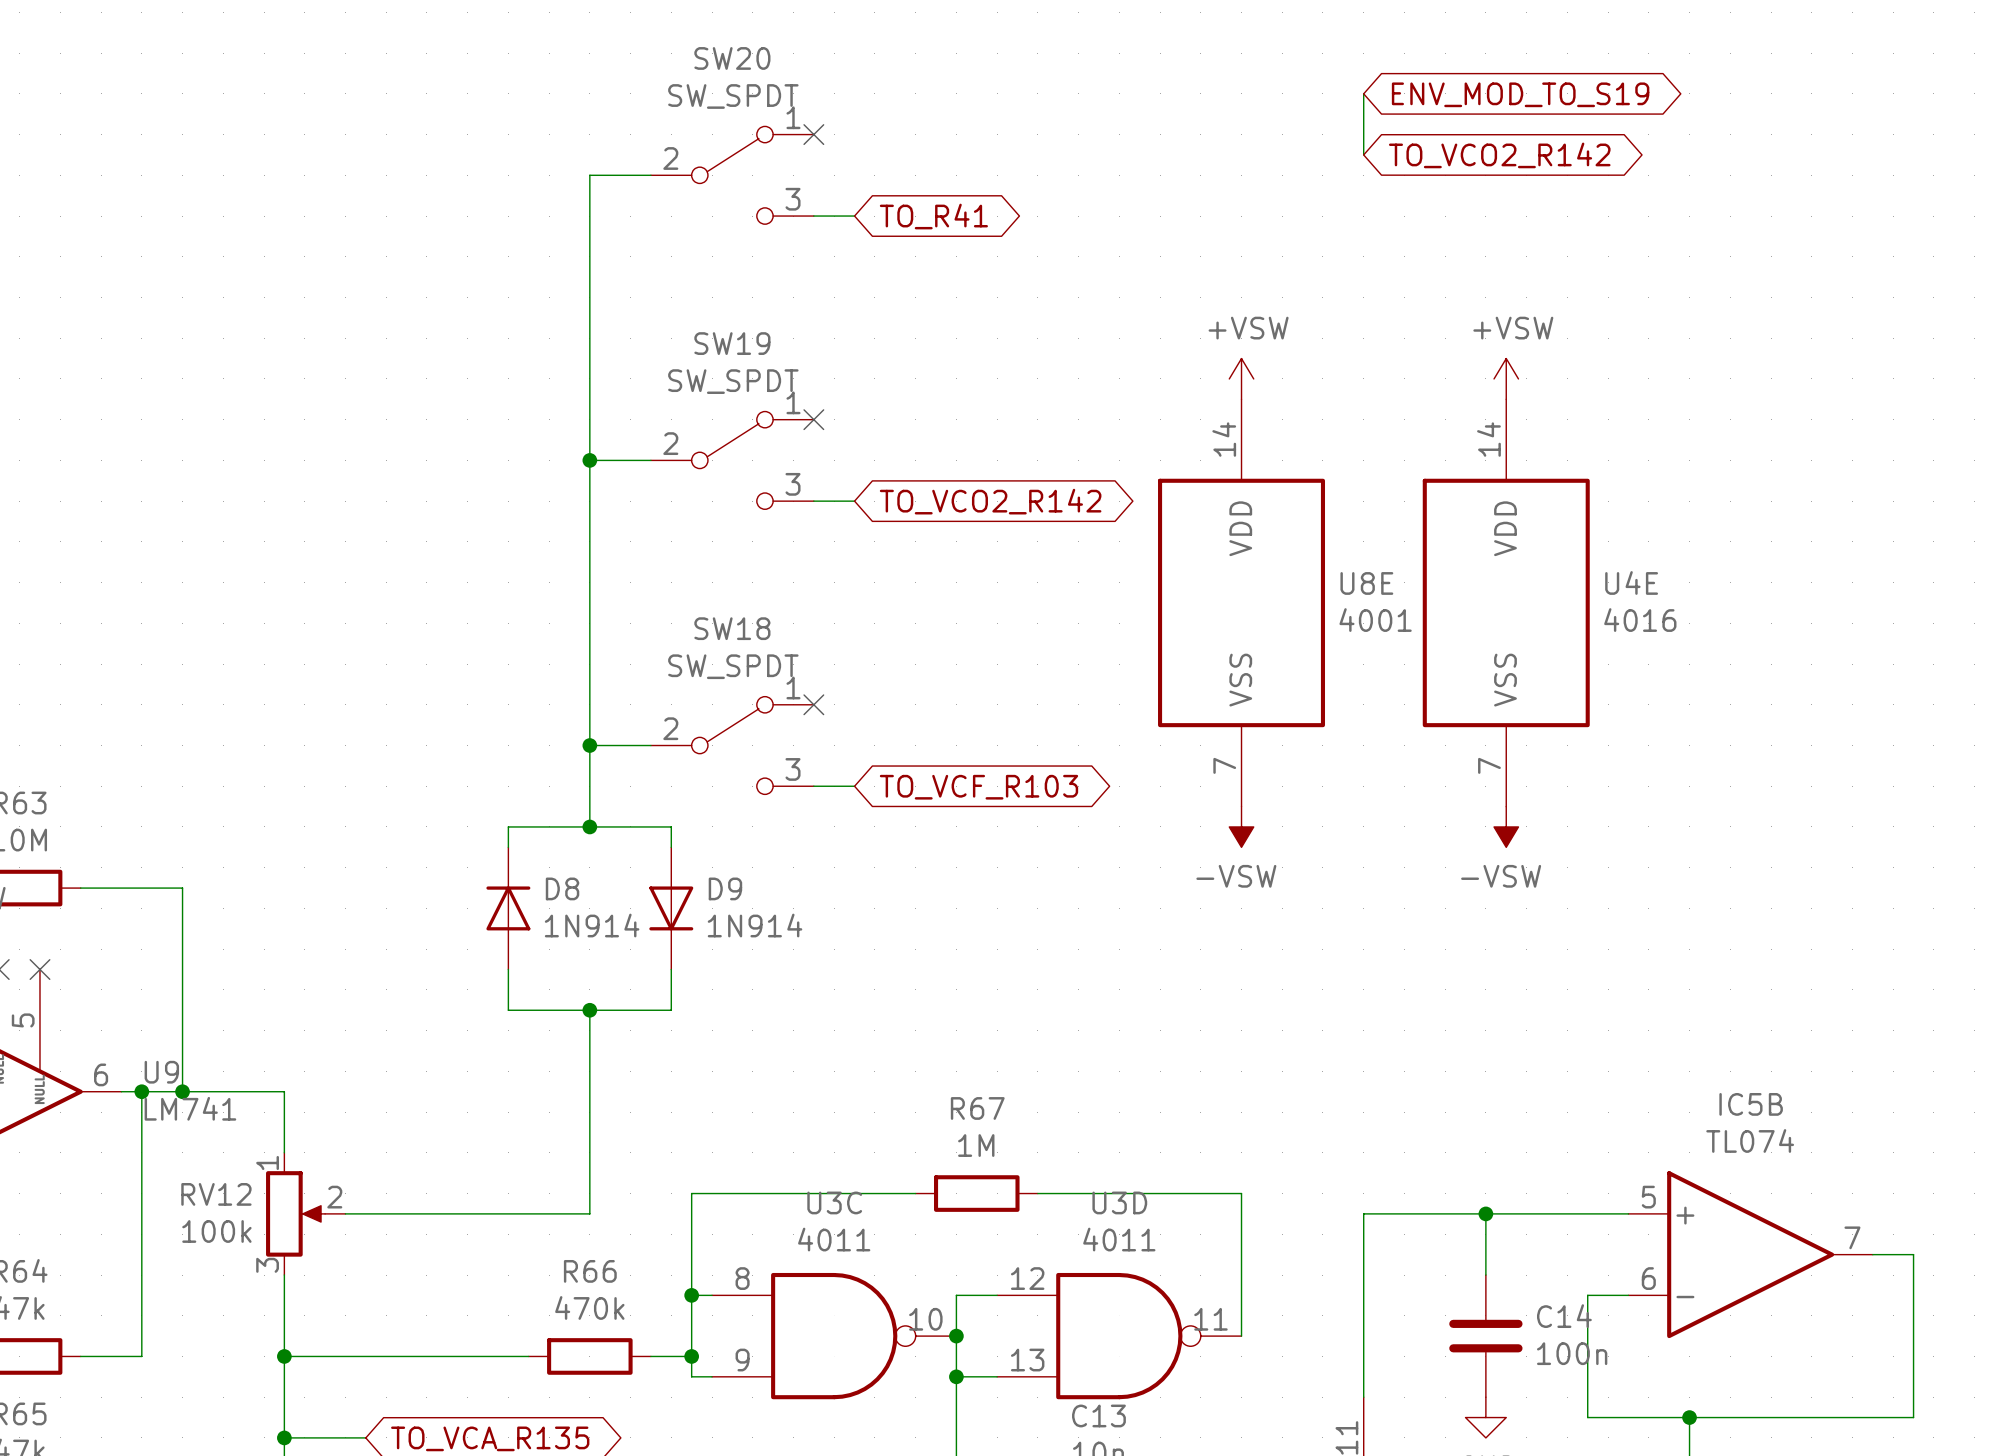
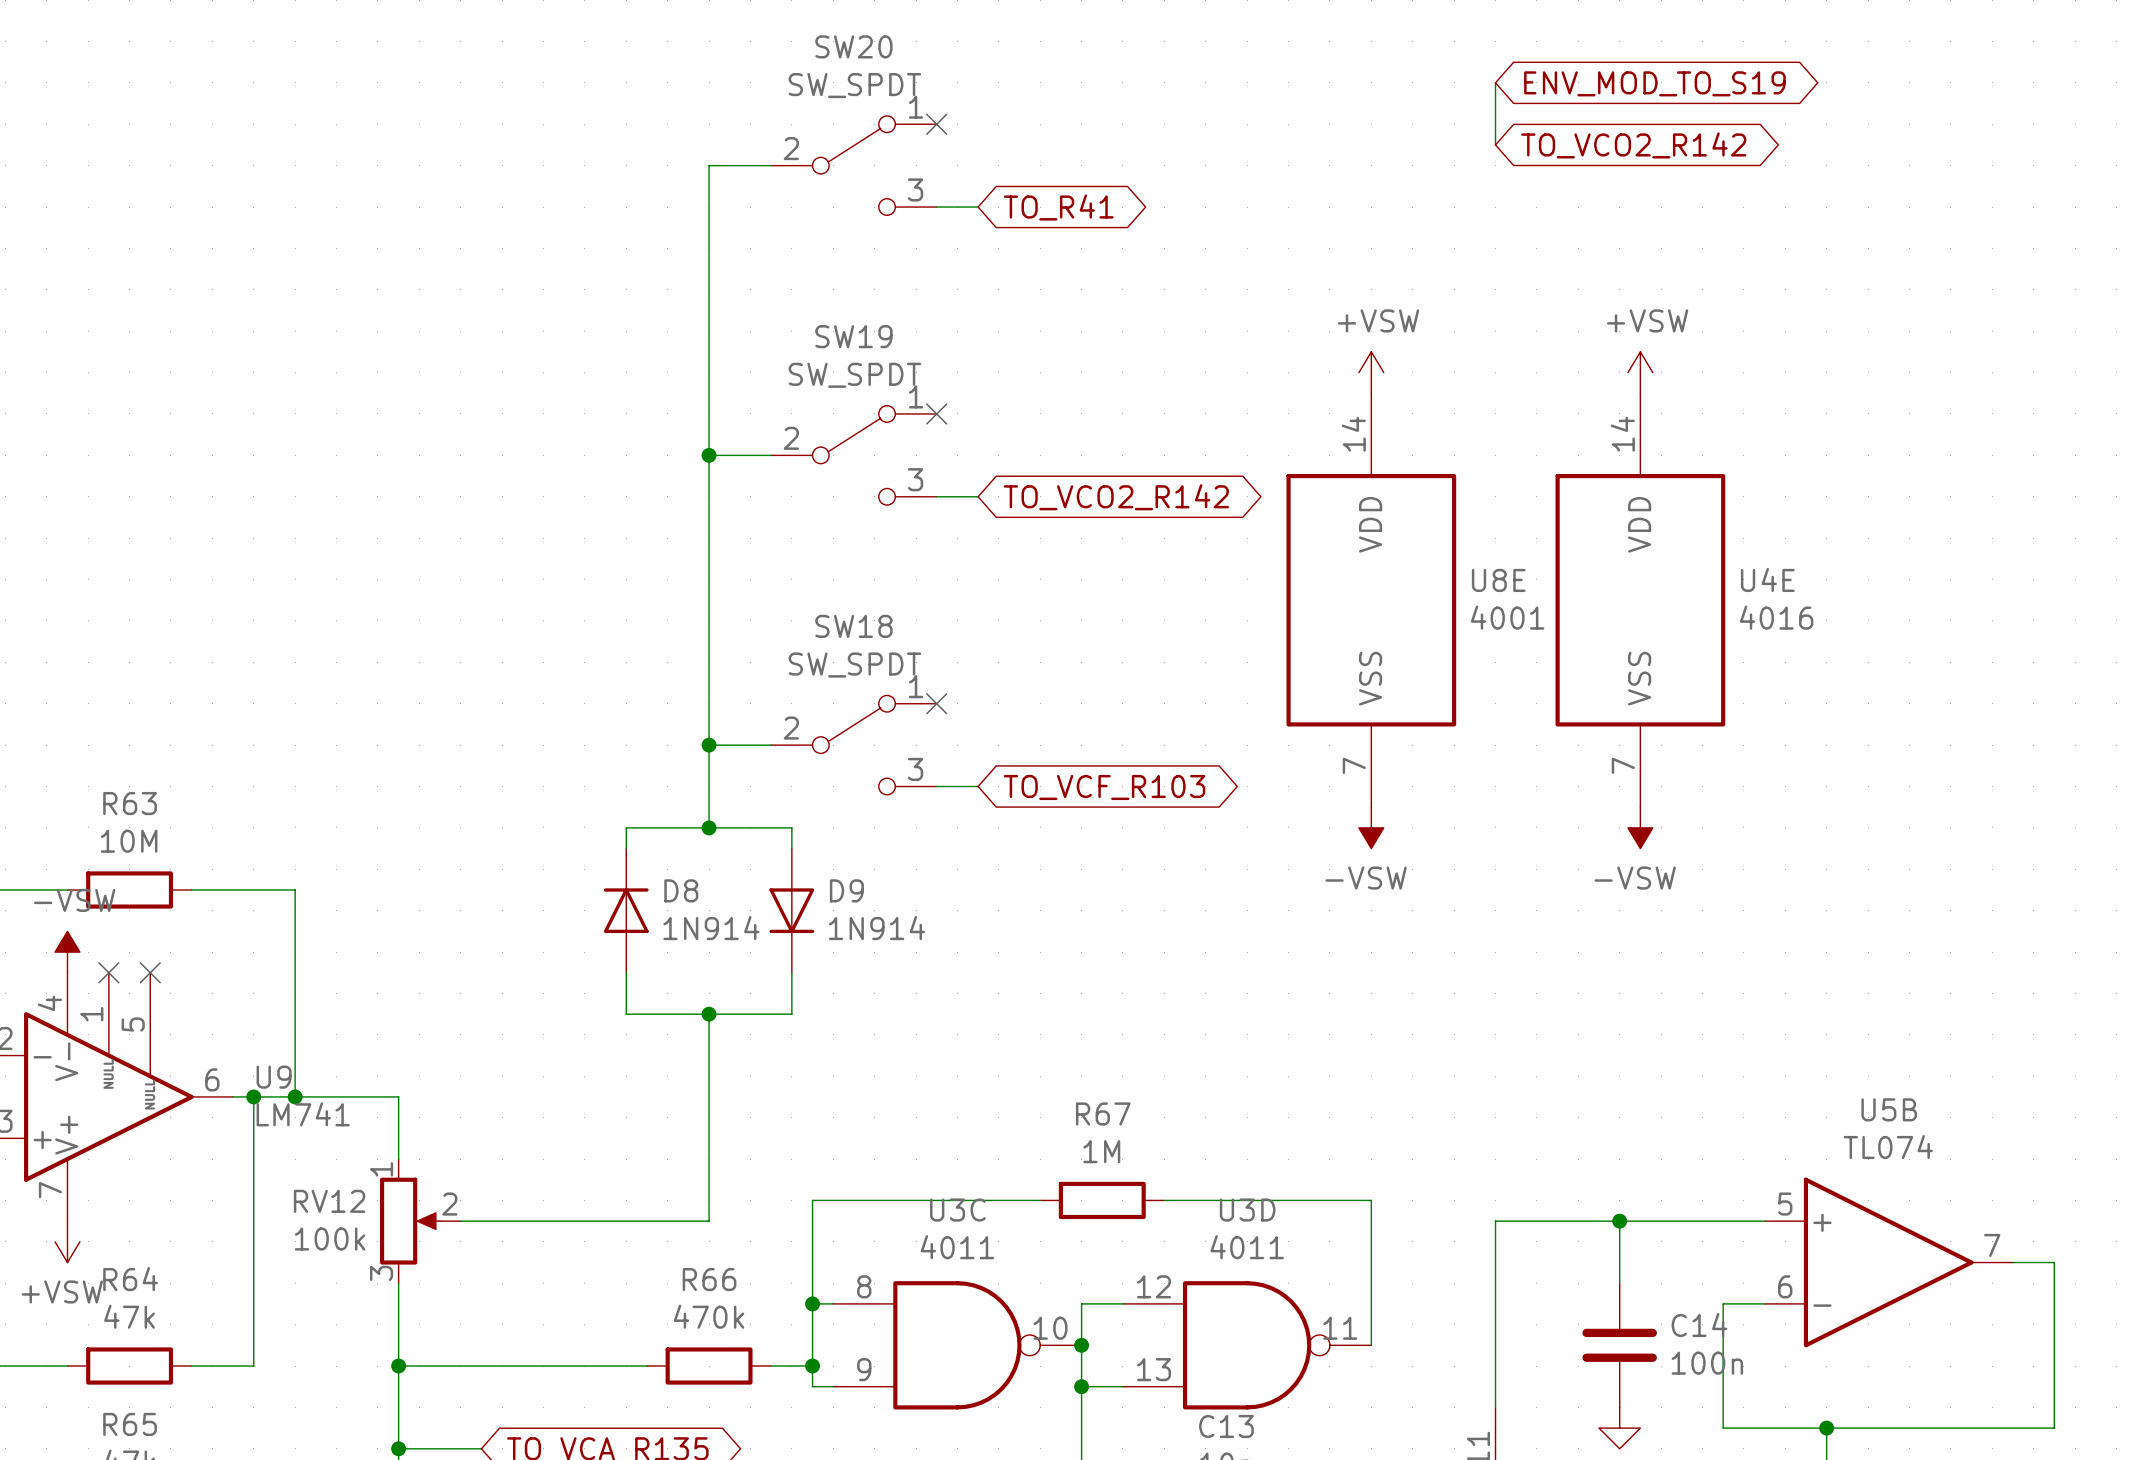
IC5B name: IC5B (1751, 1104) -> U5B (1889, 1109)

